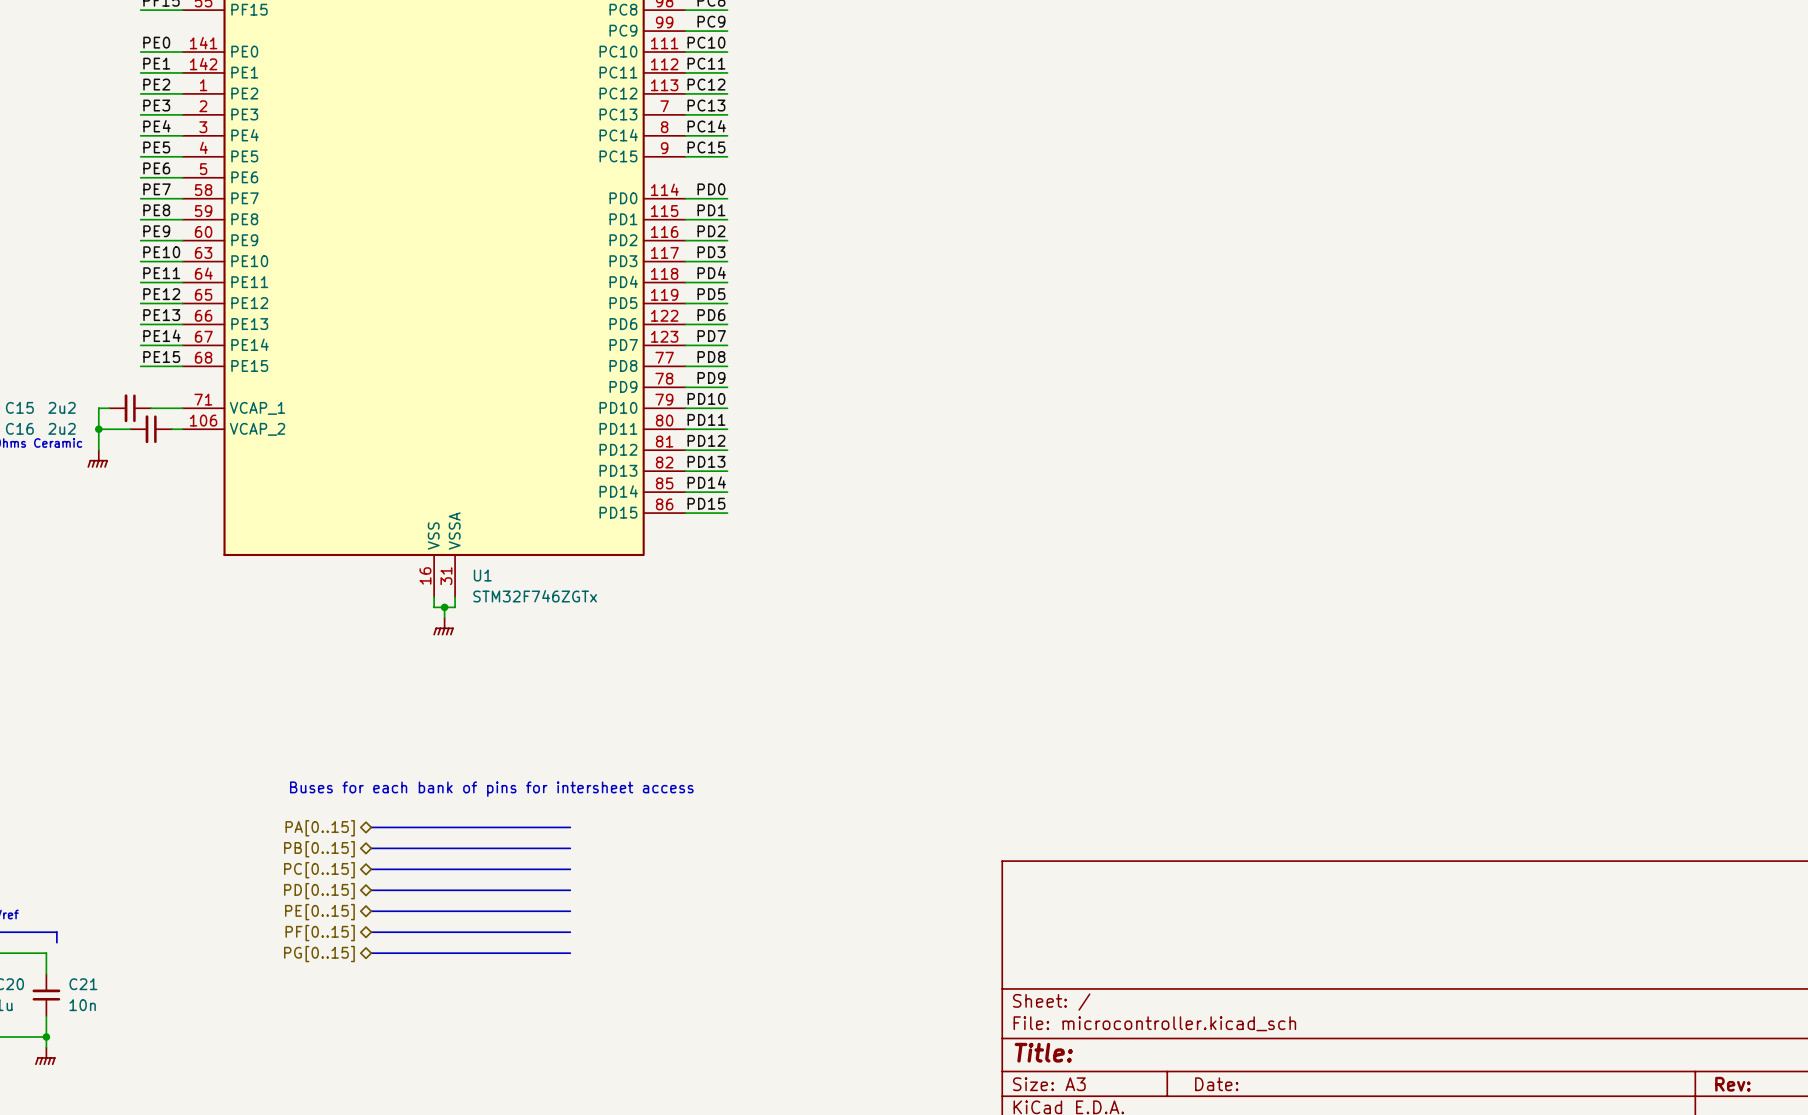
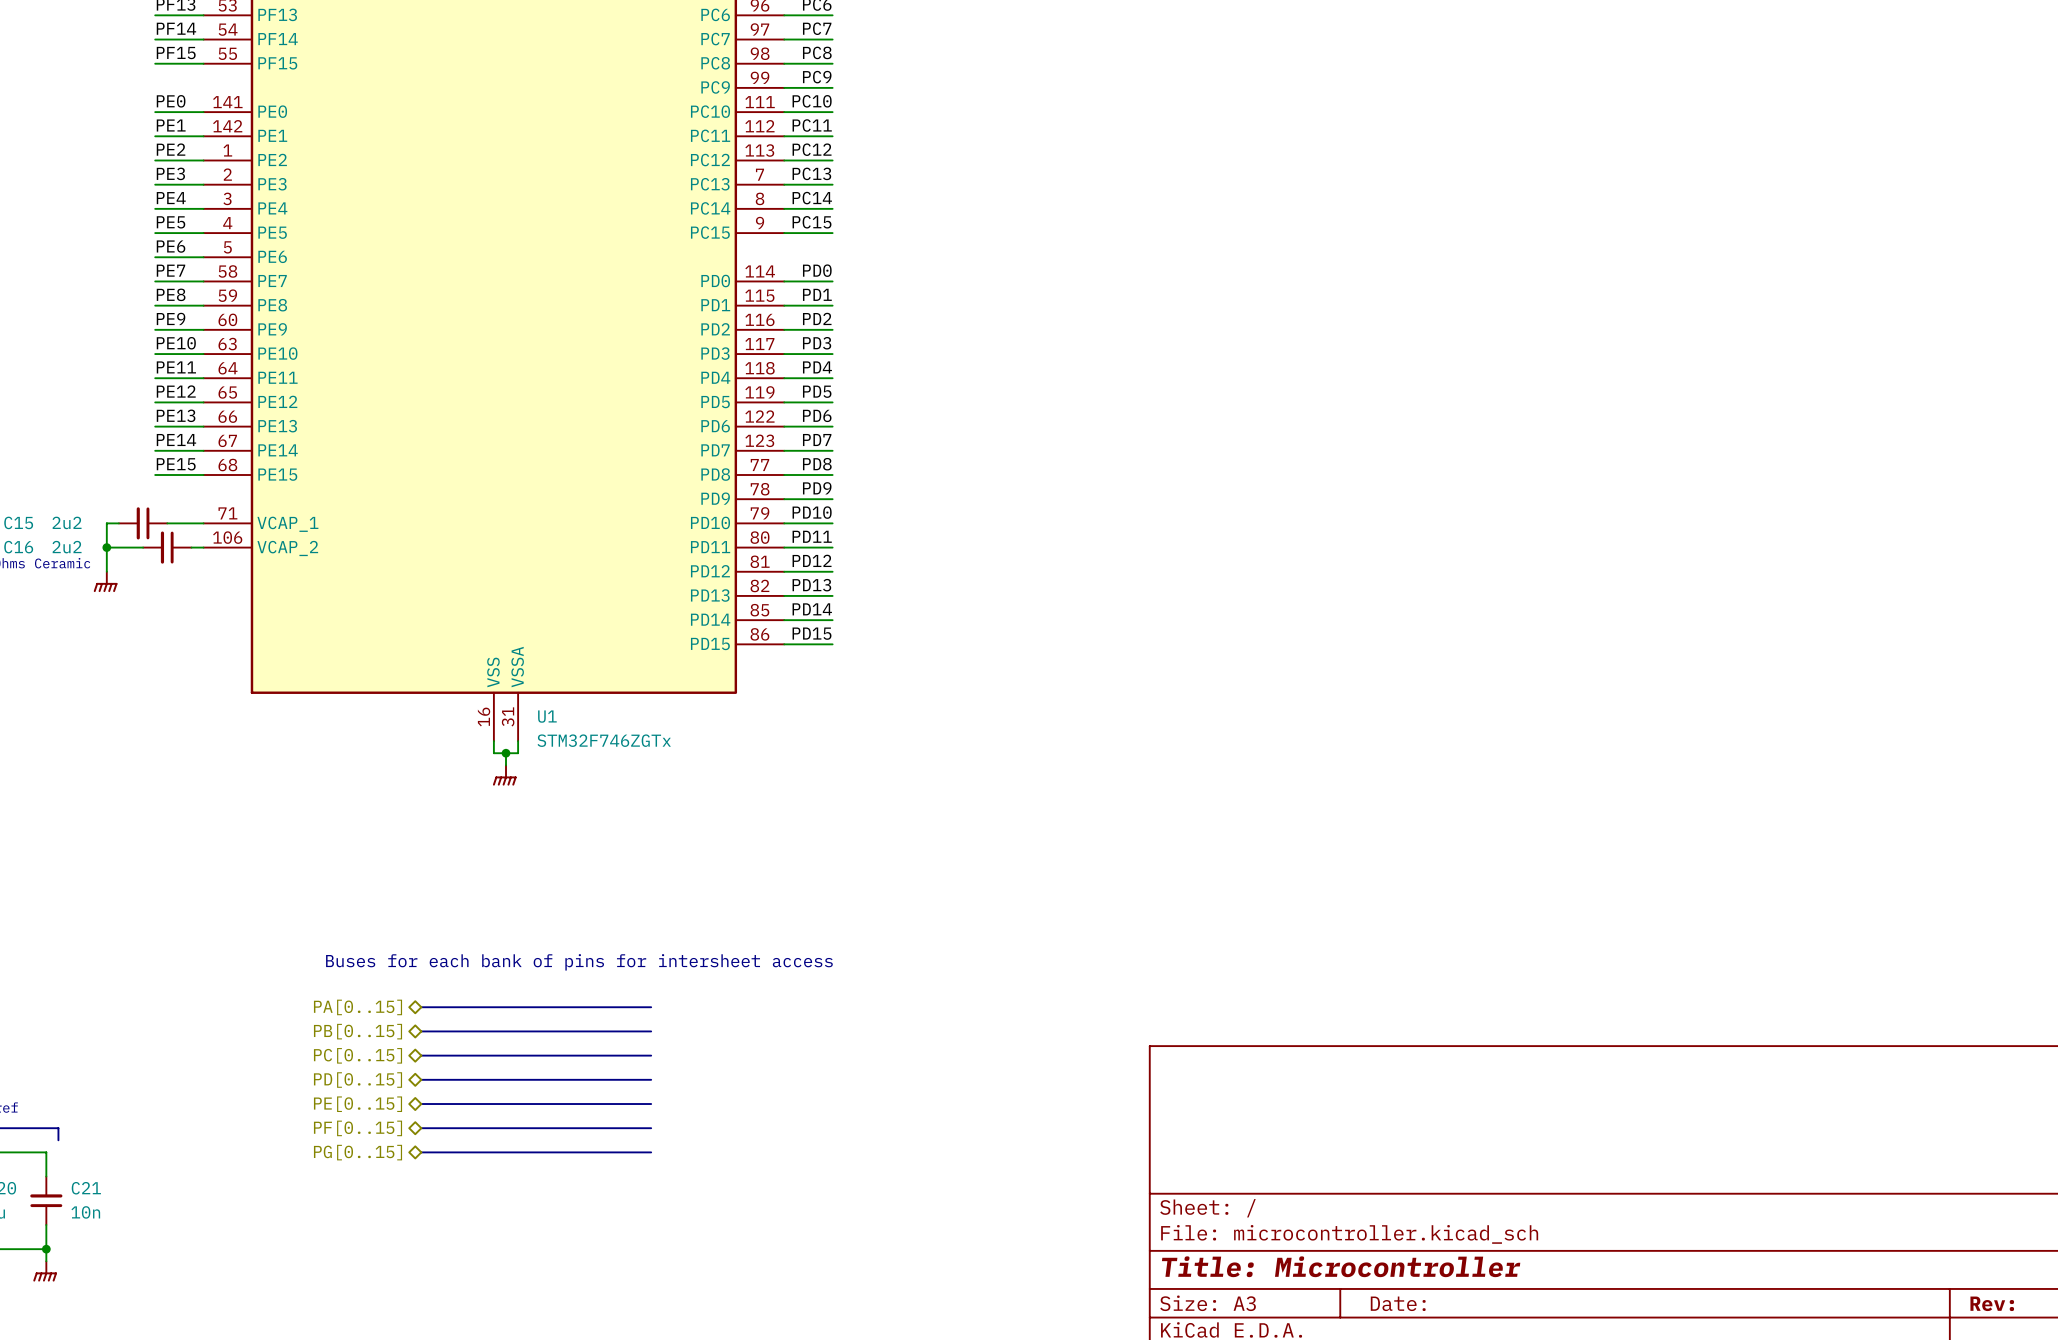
title block: Title: (1043, 1052) -> Title: Microcontroller (1341, 1266)

